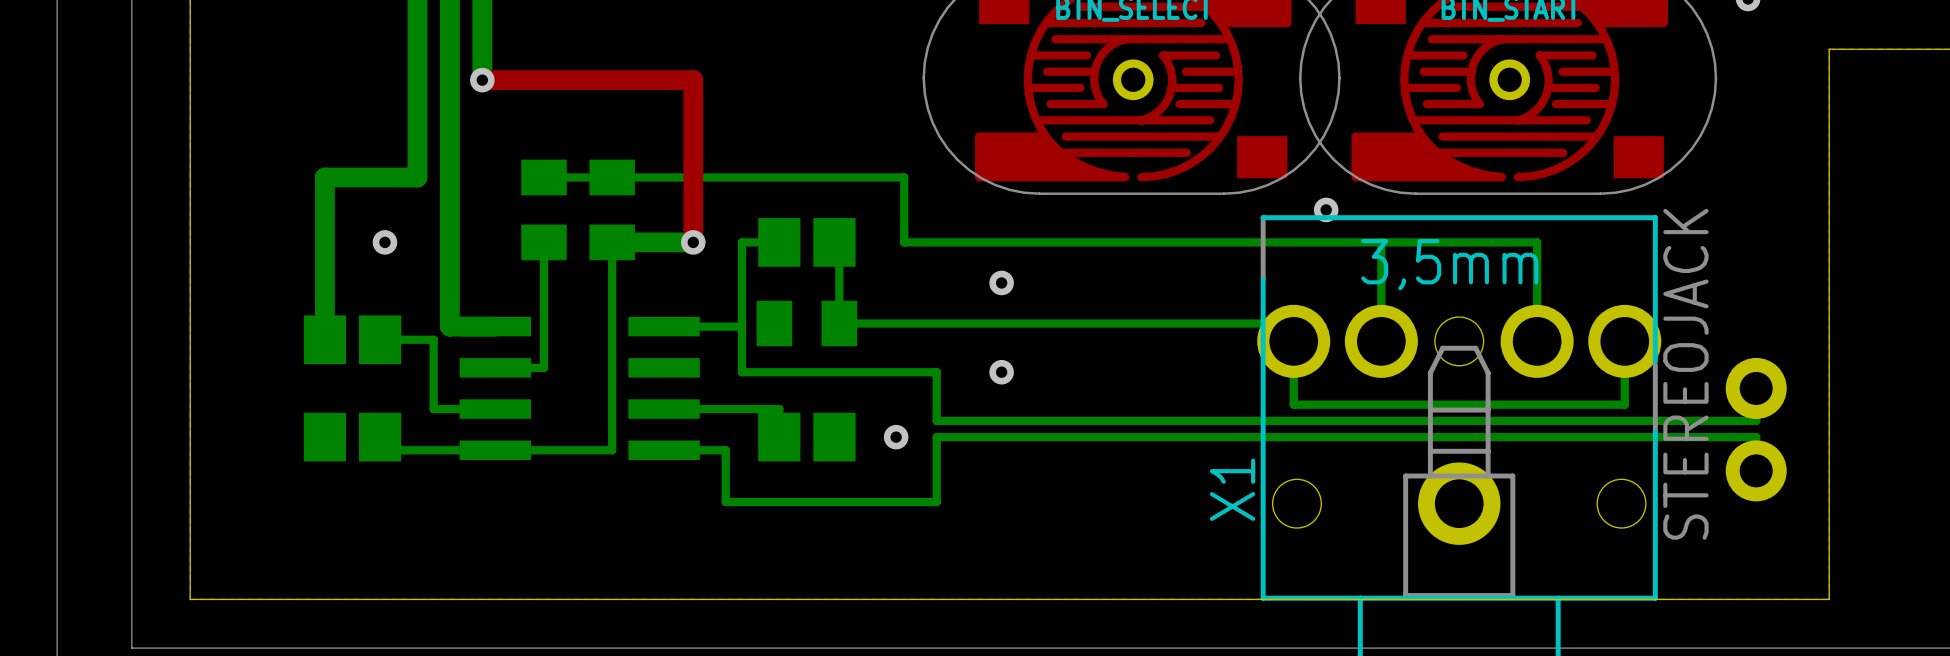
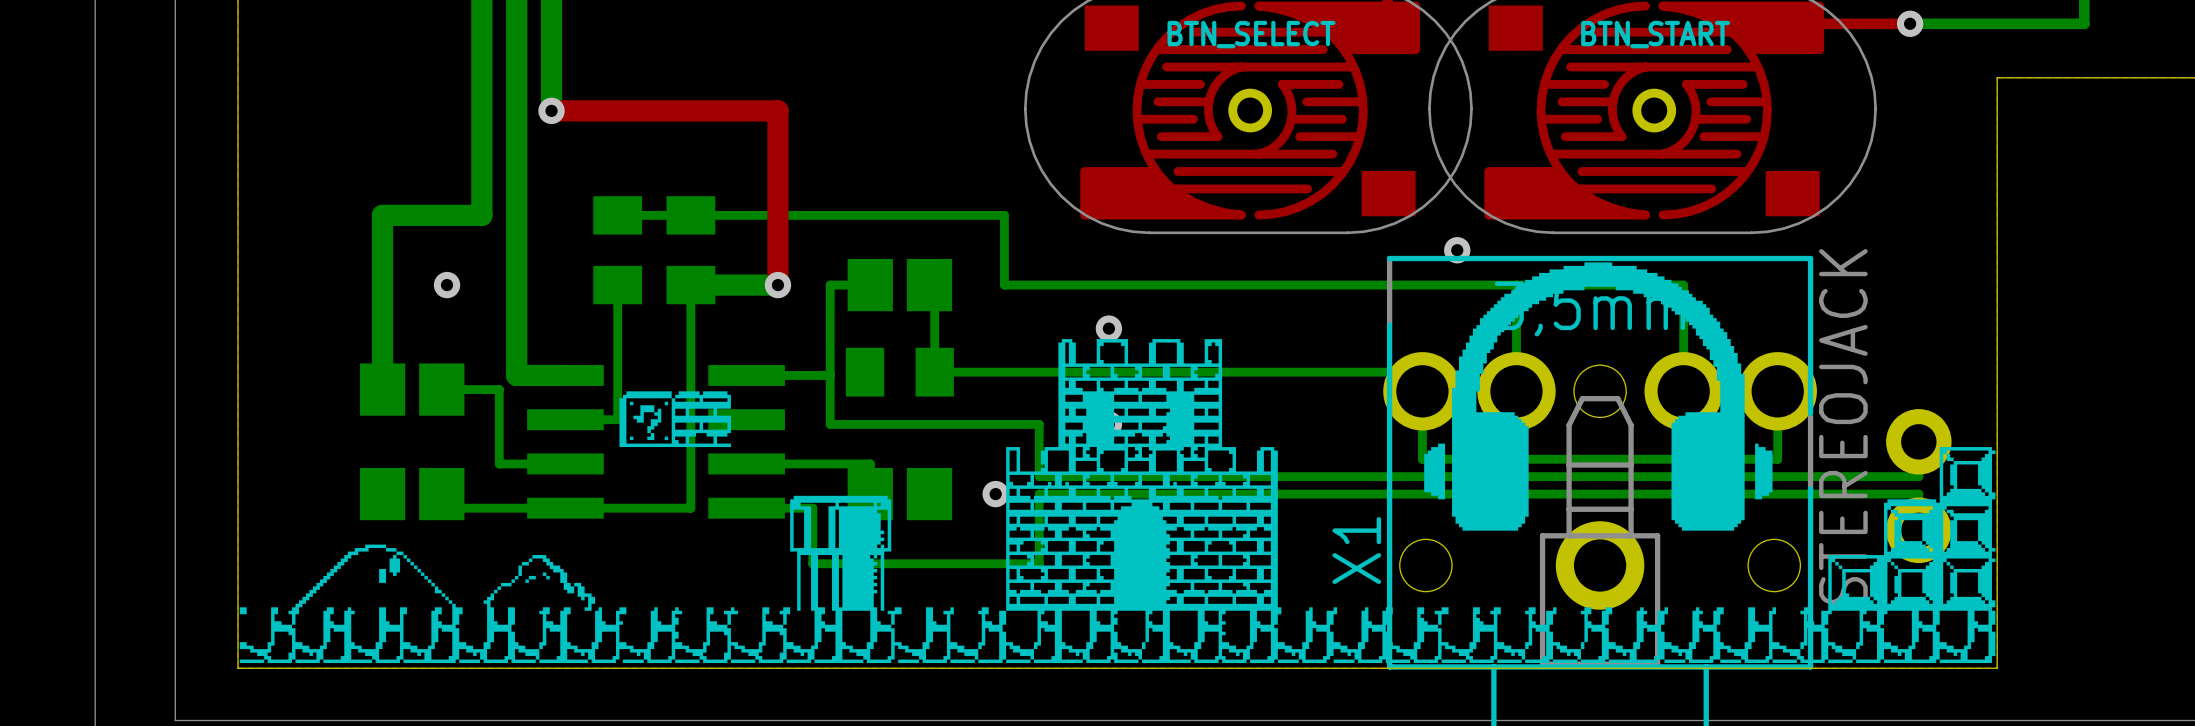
drawing: none -> [1424, 262, 1773, 531]
drawing: none -> [239, 339, 1996, 664]
drawing: none -> [619, 391, 731, 448]

